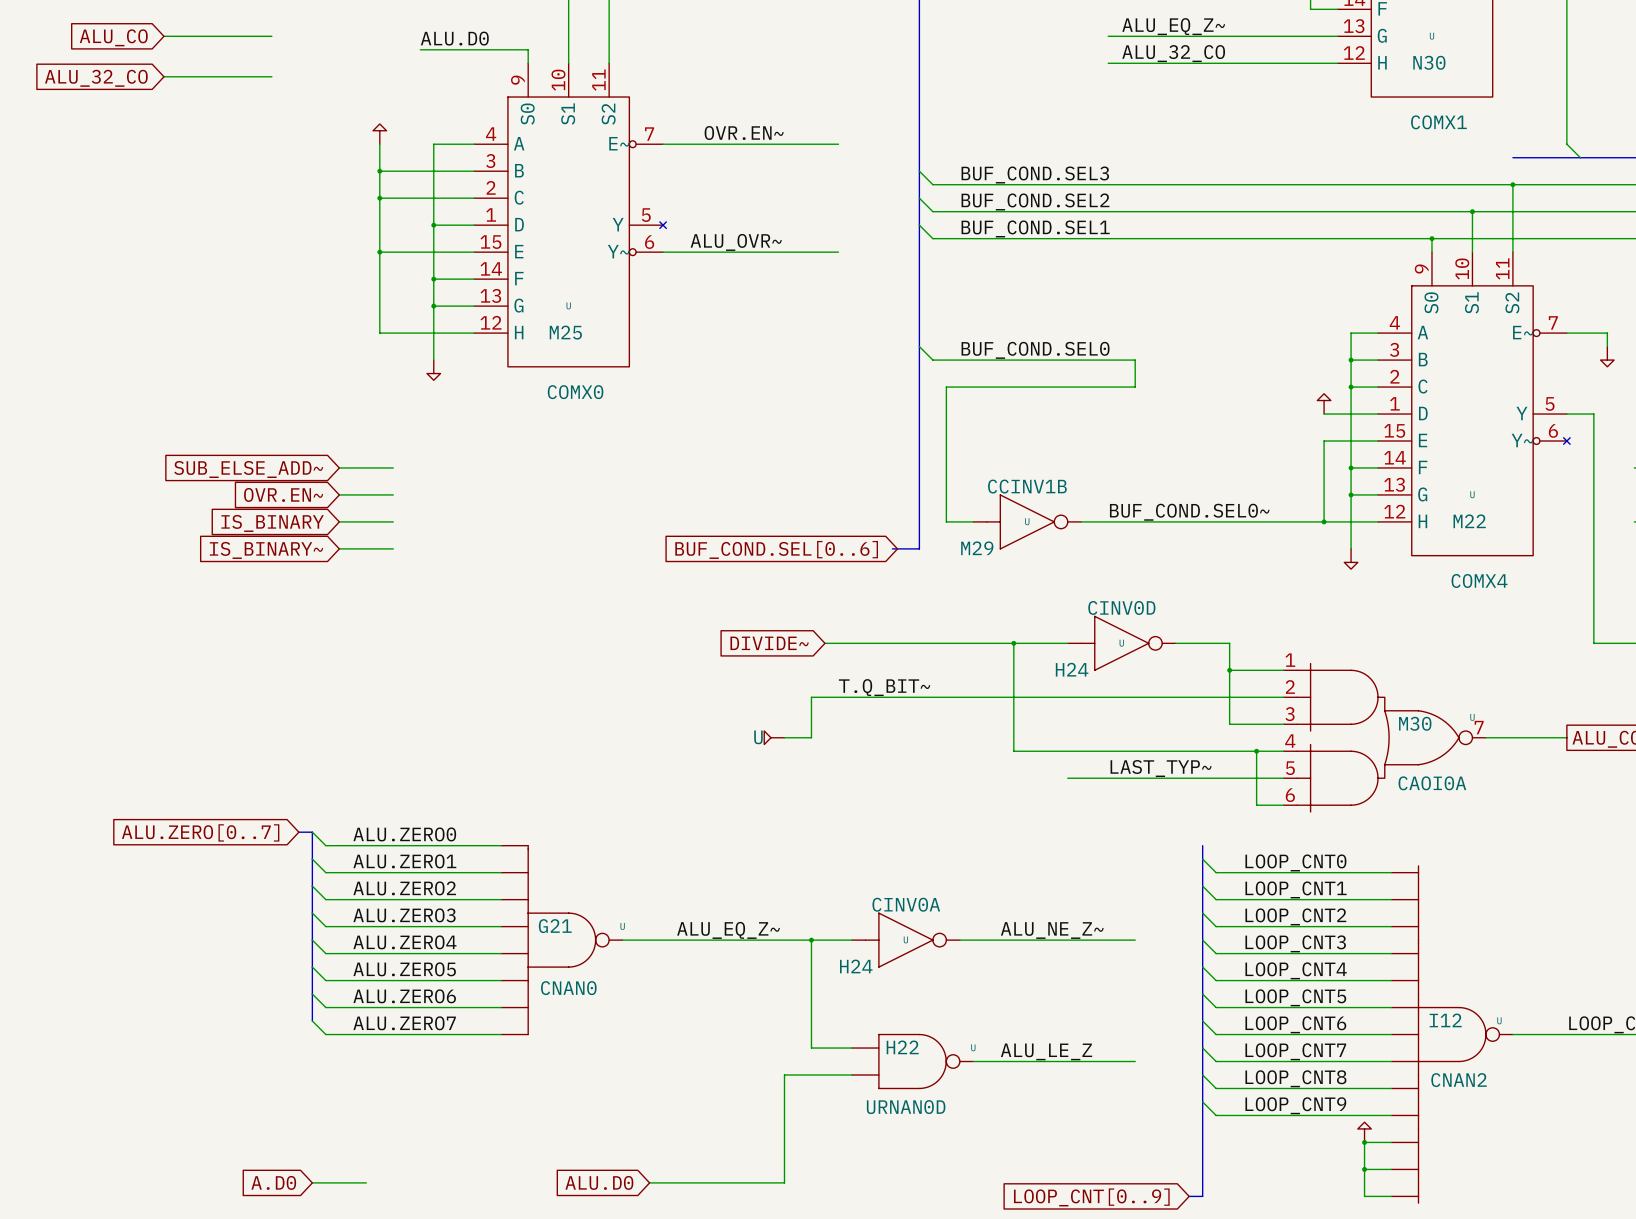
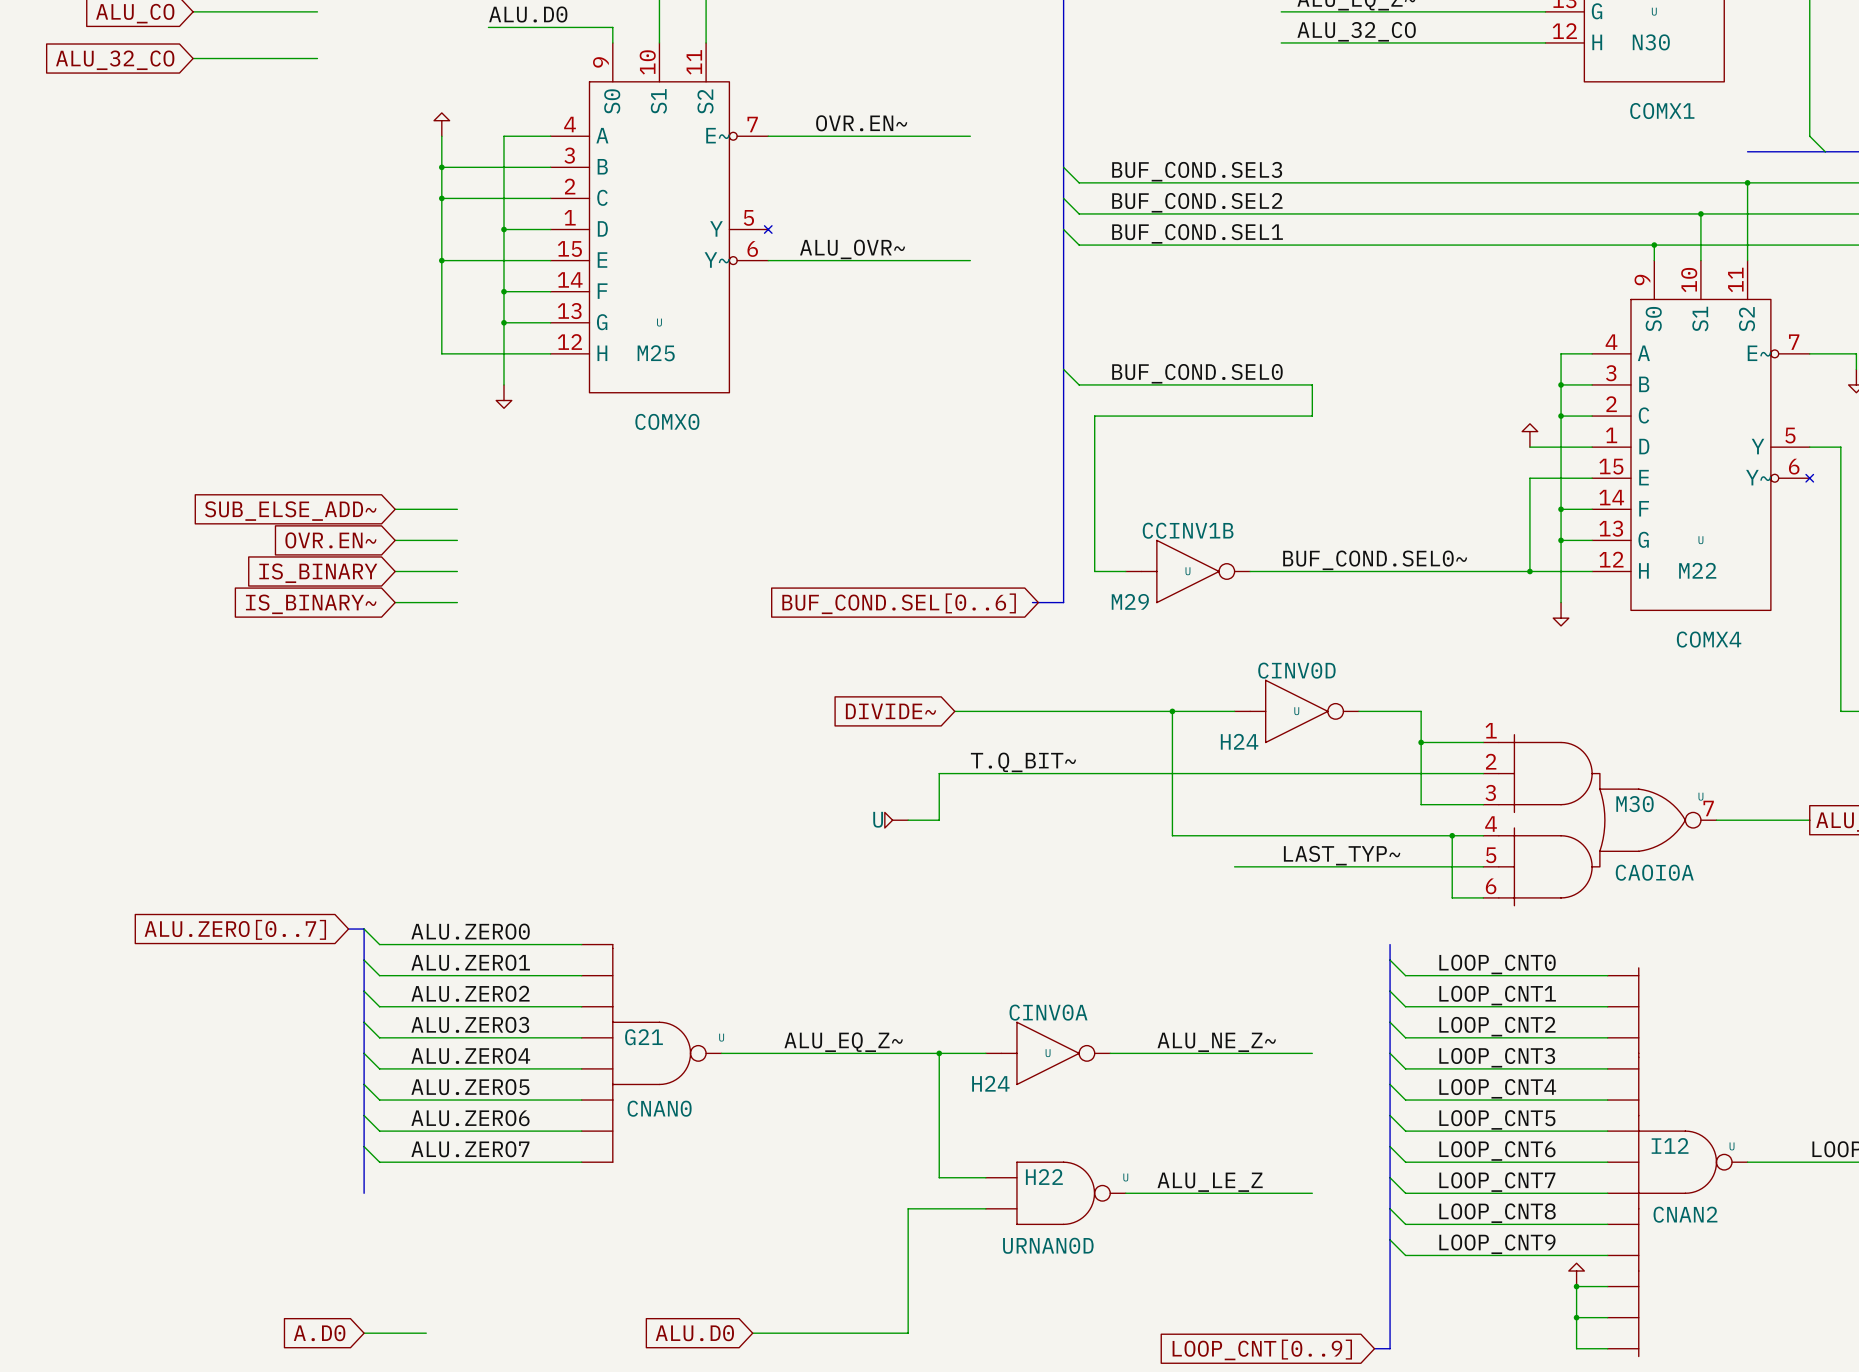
bus: none -> (364, 1146) (364, 1193)

